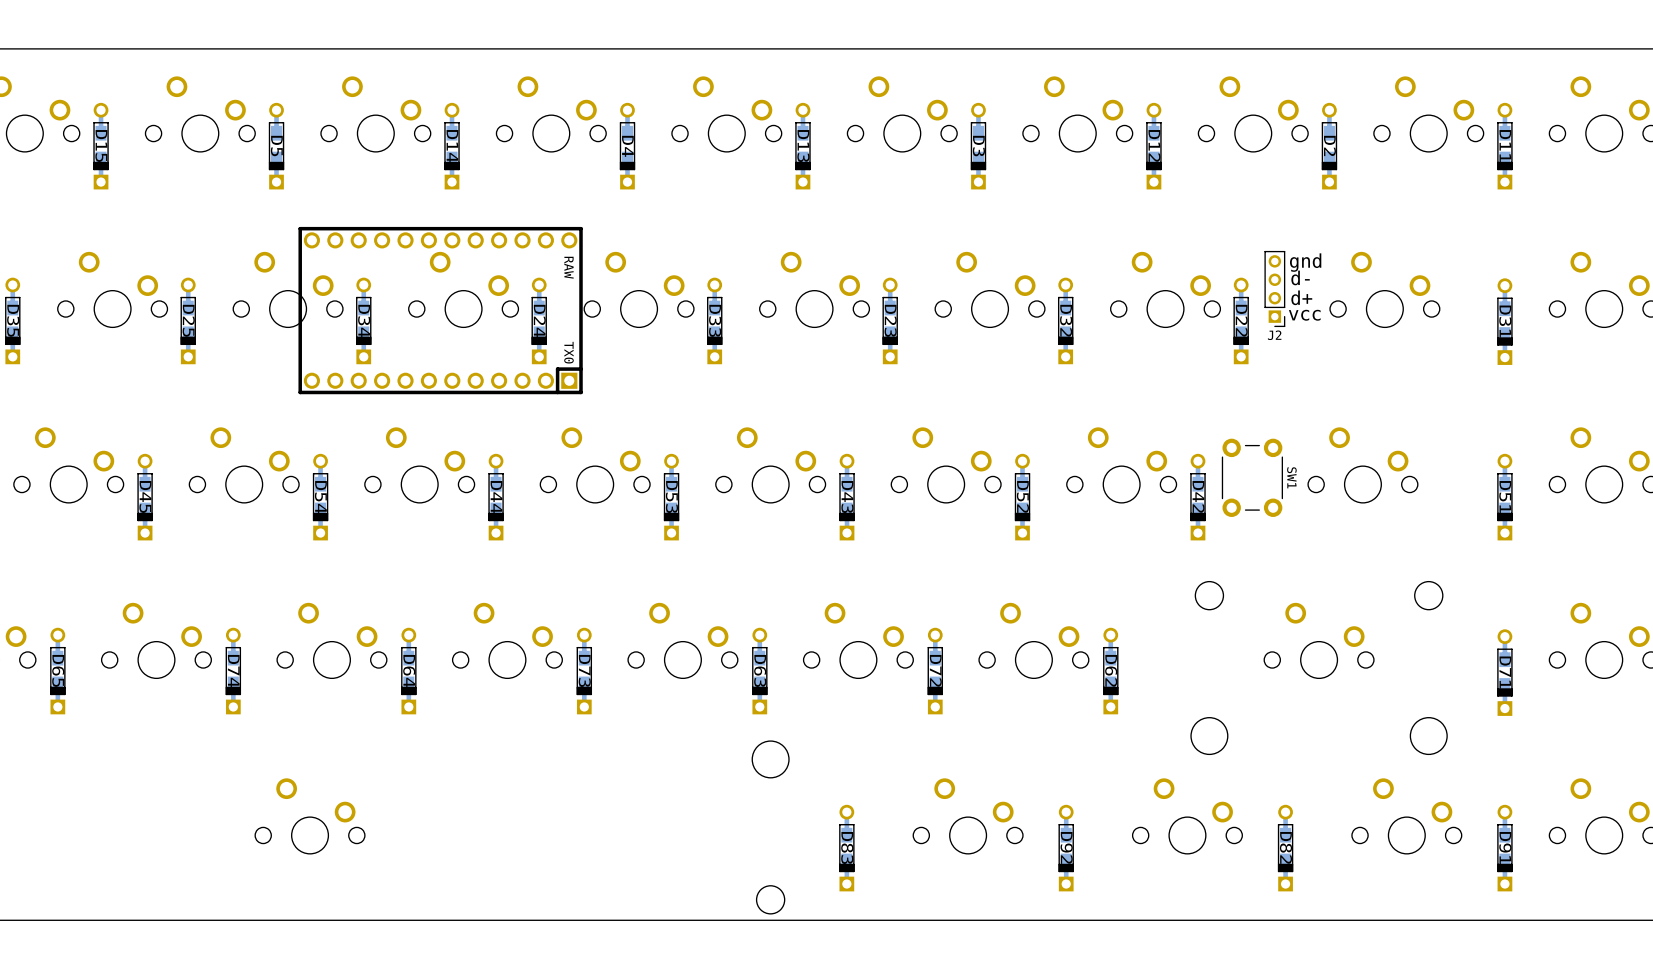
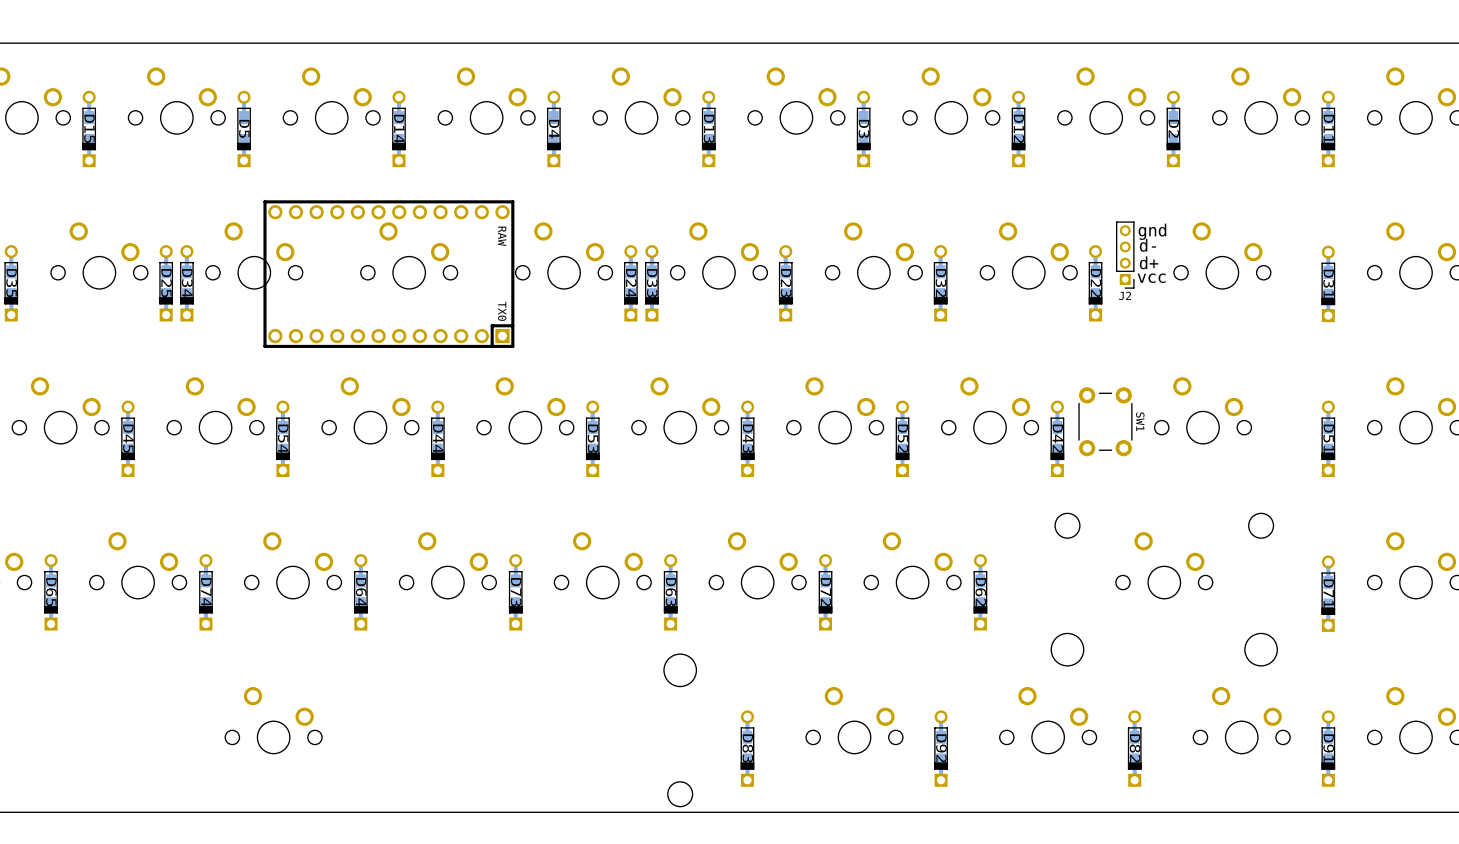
D34 position: (363, 320) -> (186, 283)
D24: (539, 320) -> none
D33 name: D33 (715, 320) -> D24 (631, 283)
D33: none -> (651, 283)

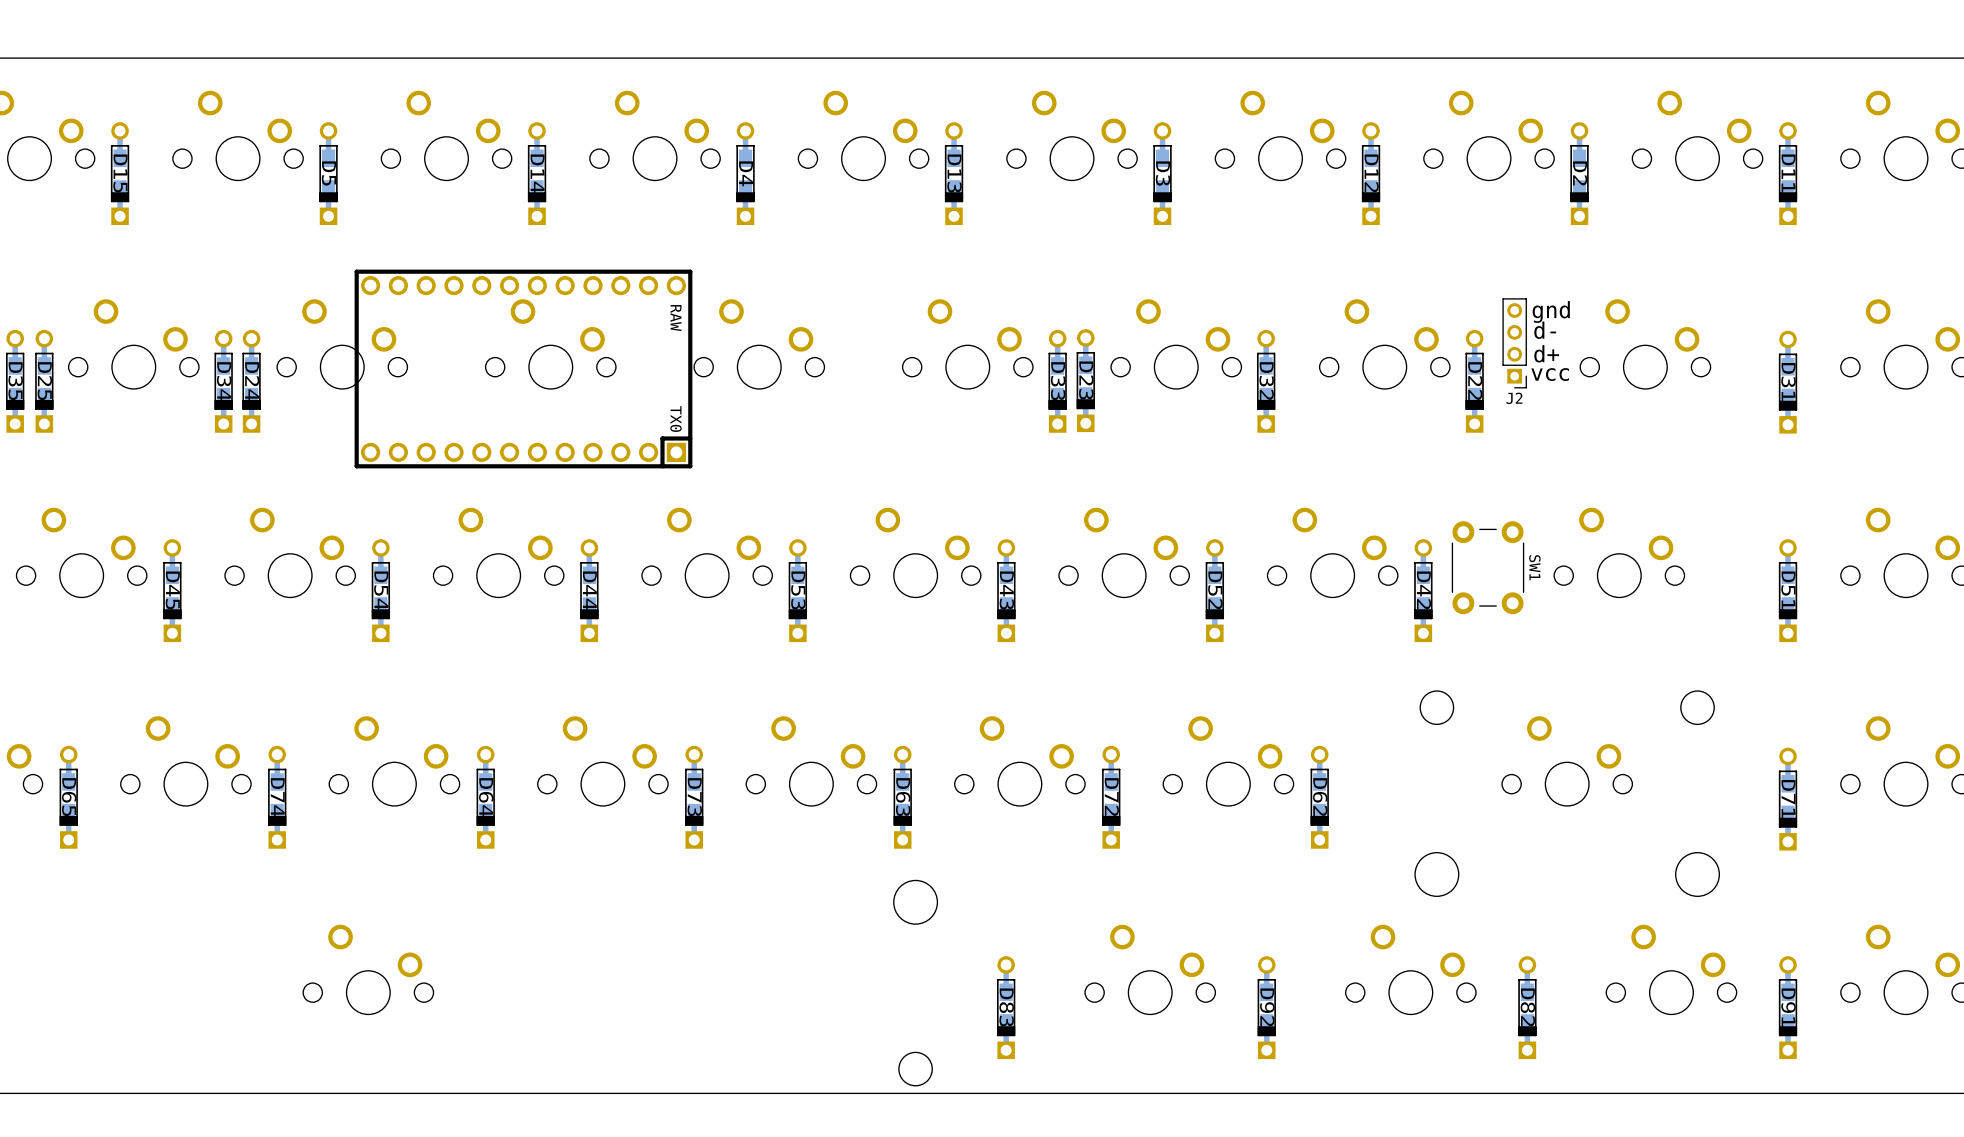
D23: none -> (1085, 380)
D25: none -> (44, 381)
D25 name: D25 (166, 283) -> D34 (224, 381)
D34 name: D34 (187, 283) -> D24 (252, 381)
D24: (630, 283) -> none
D33: (651, 283) -> none
D23 name: D23 (786, 283) -> D33 (1058, 381)

